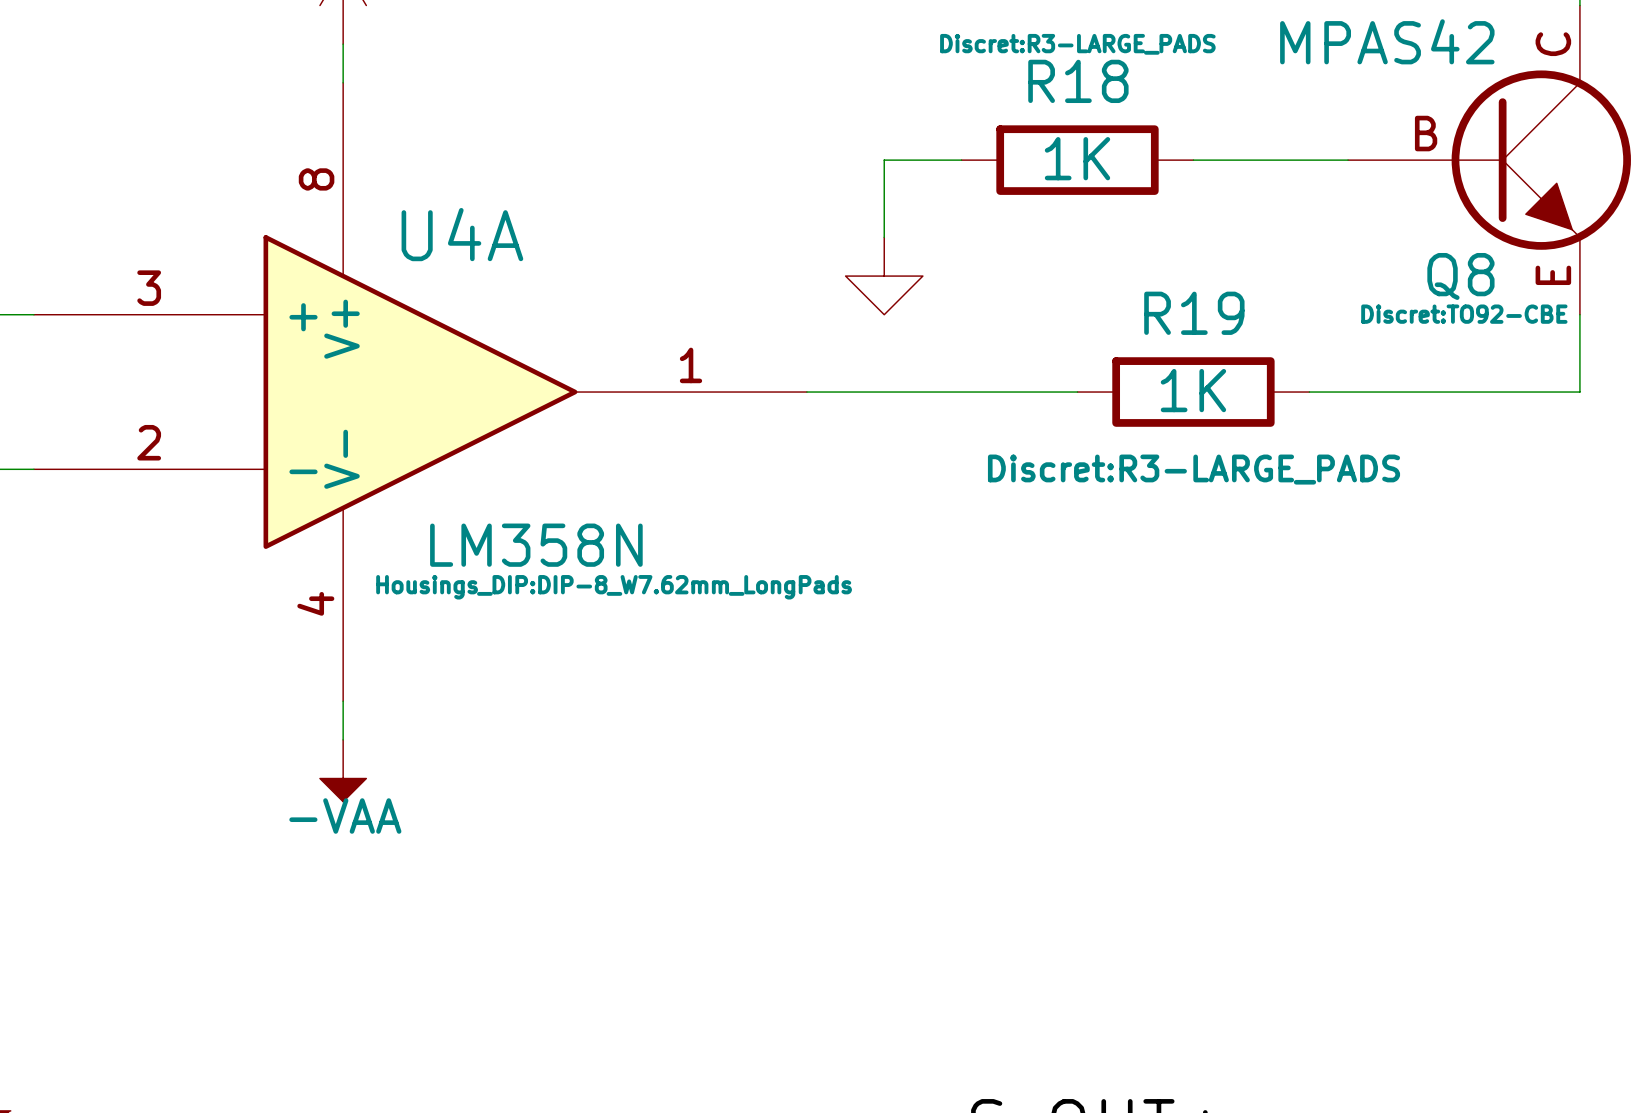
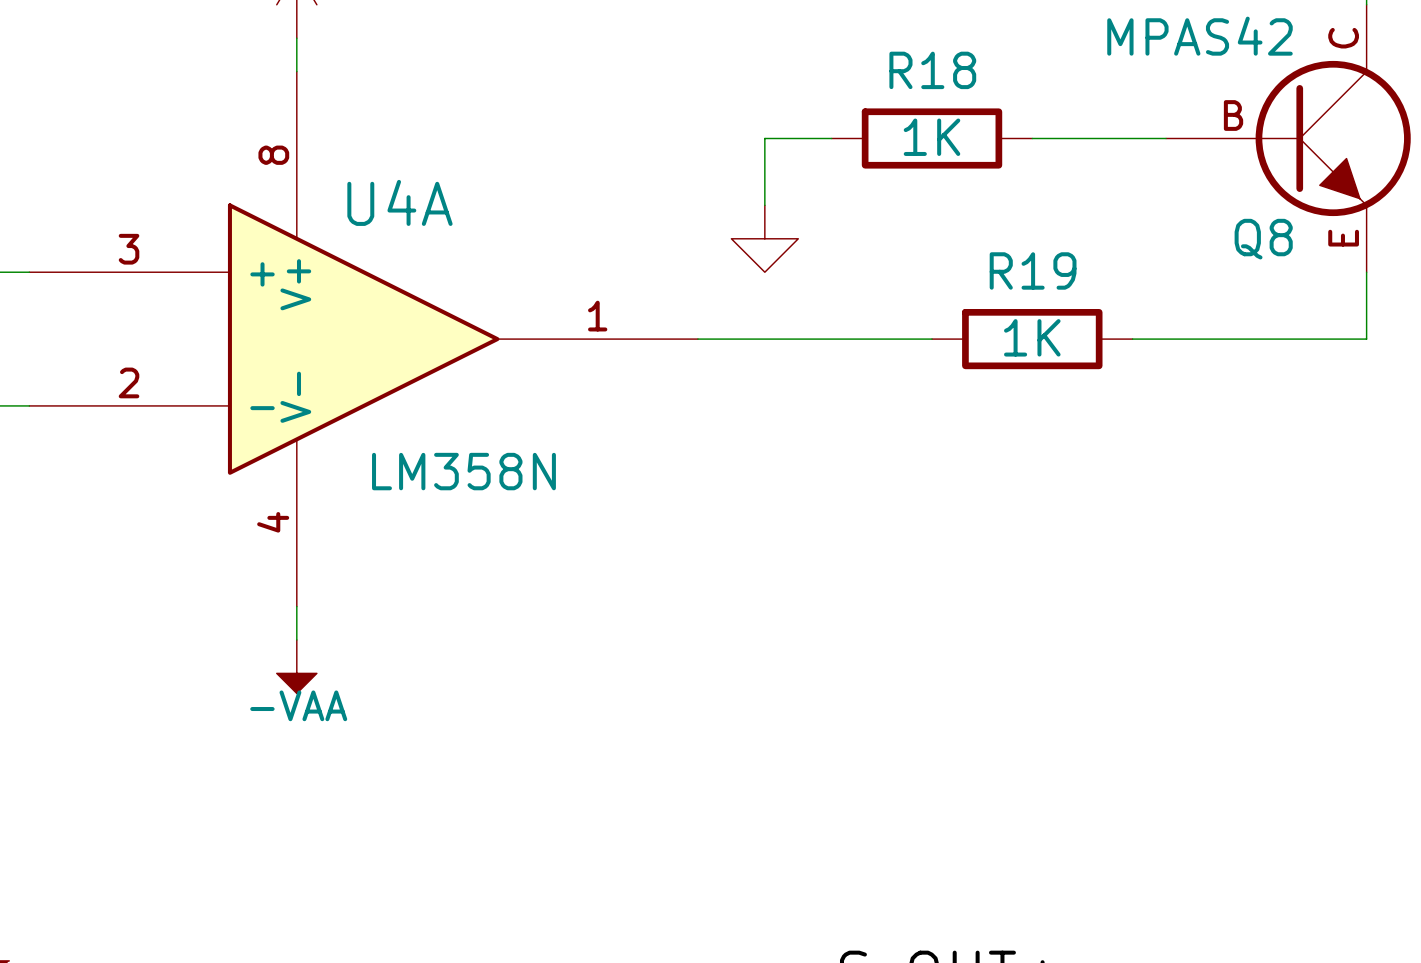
R18 text: Discret:R3-LARGE_PADS (1077, 44) -> none
Q8 text: Discret:TO92-CBE (1464, 314) -> none
R19 text: Discret:R3-LARGE_PADS (1193, 469) -> none
U4A text: Housings_DIP:DIP-8_W7.62mm_LongPads (614, 587) -> none

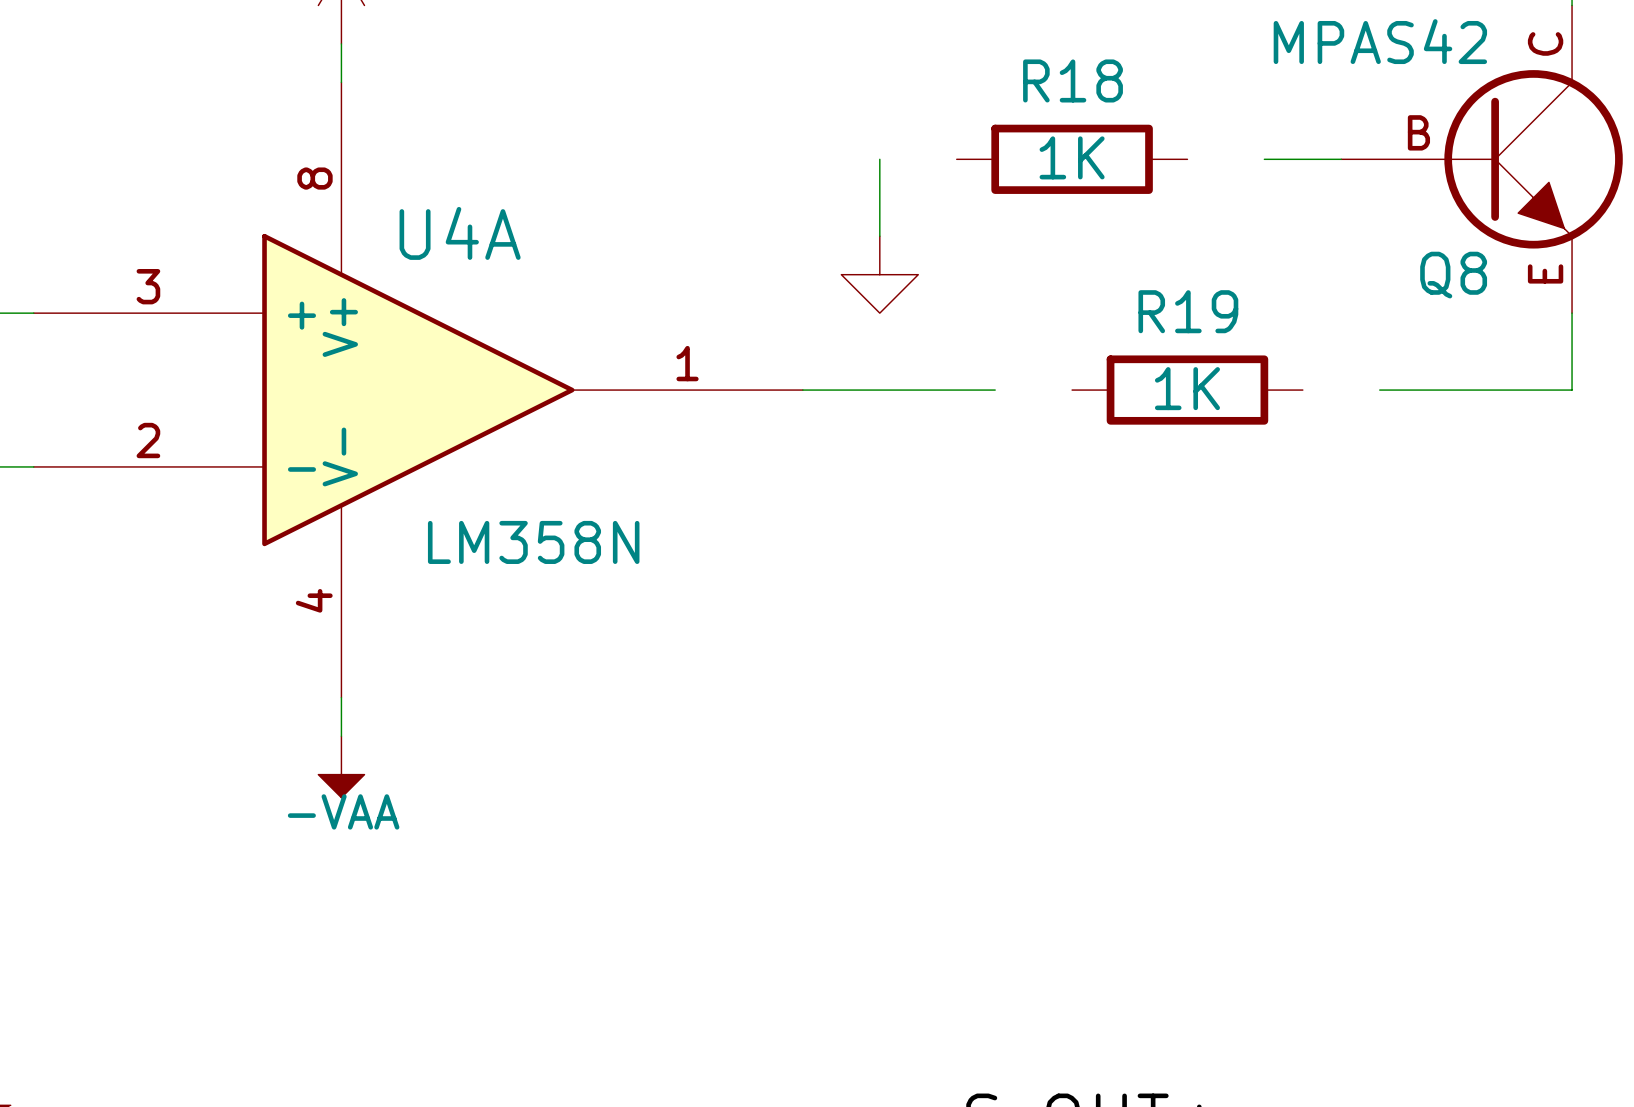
wire: (764, 138) (831, 138) -> none
wire: (1032, 138) (1099, 138) -> none
wire: (865, 339) (932, 339) -> none
wire: (1132, 339) (1199, 339) -> none

